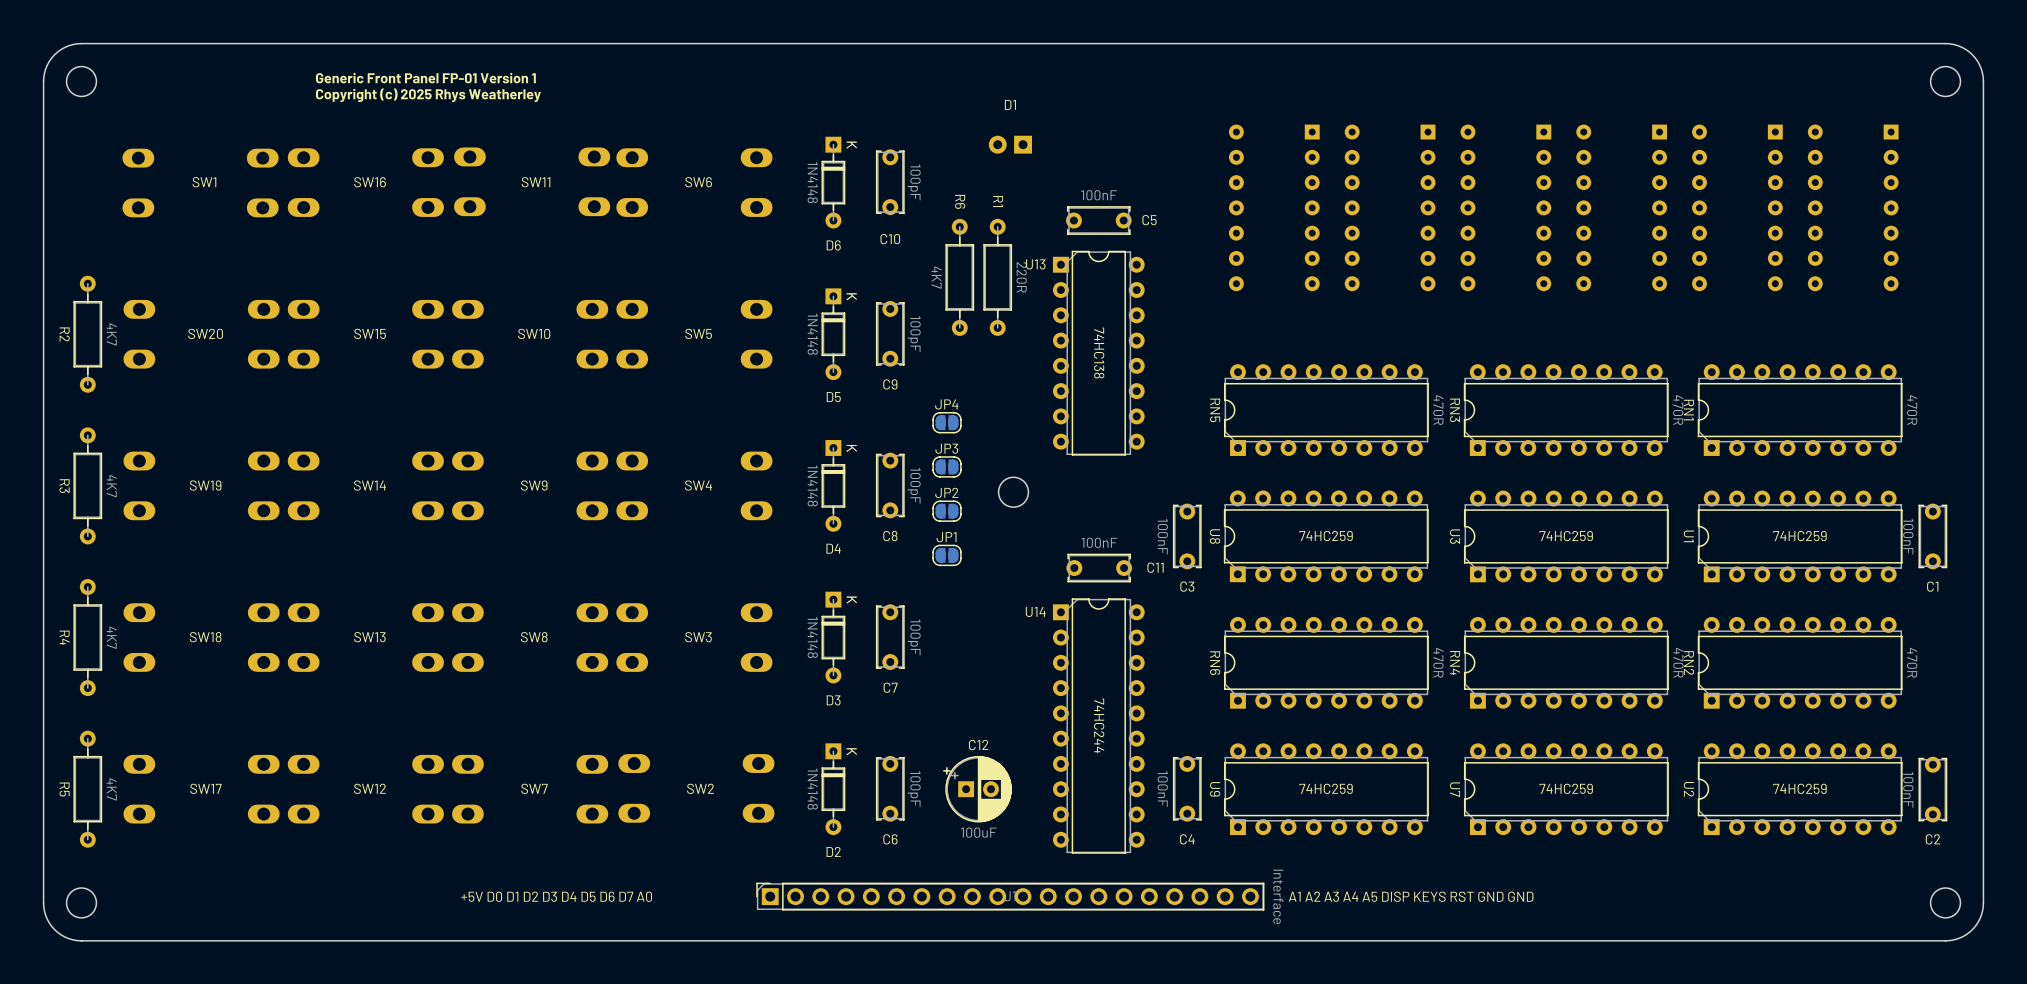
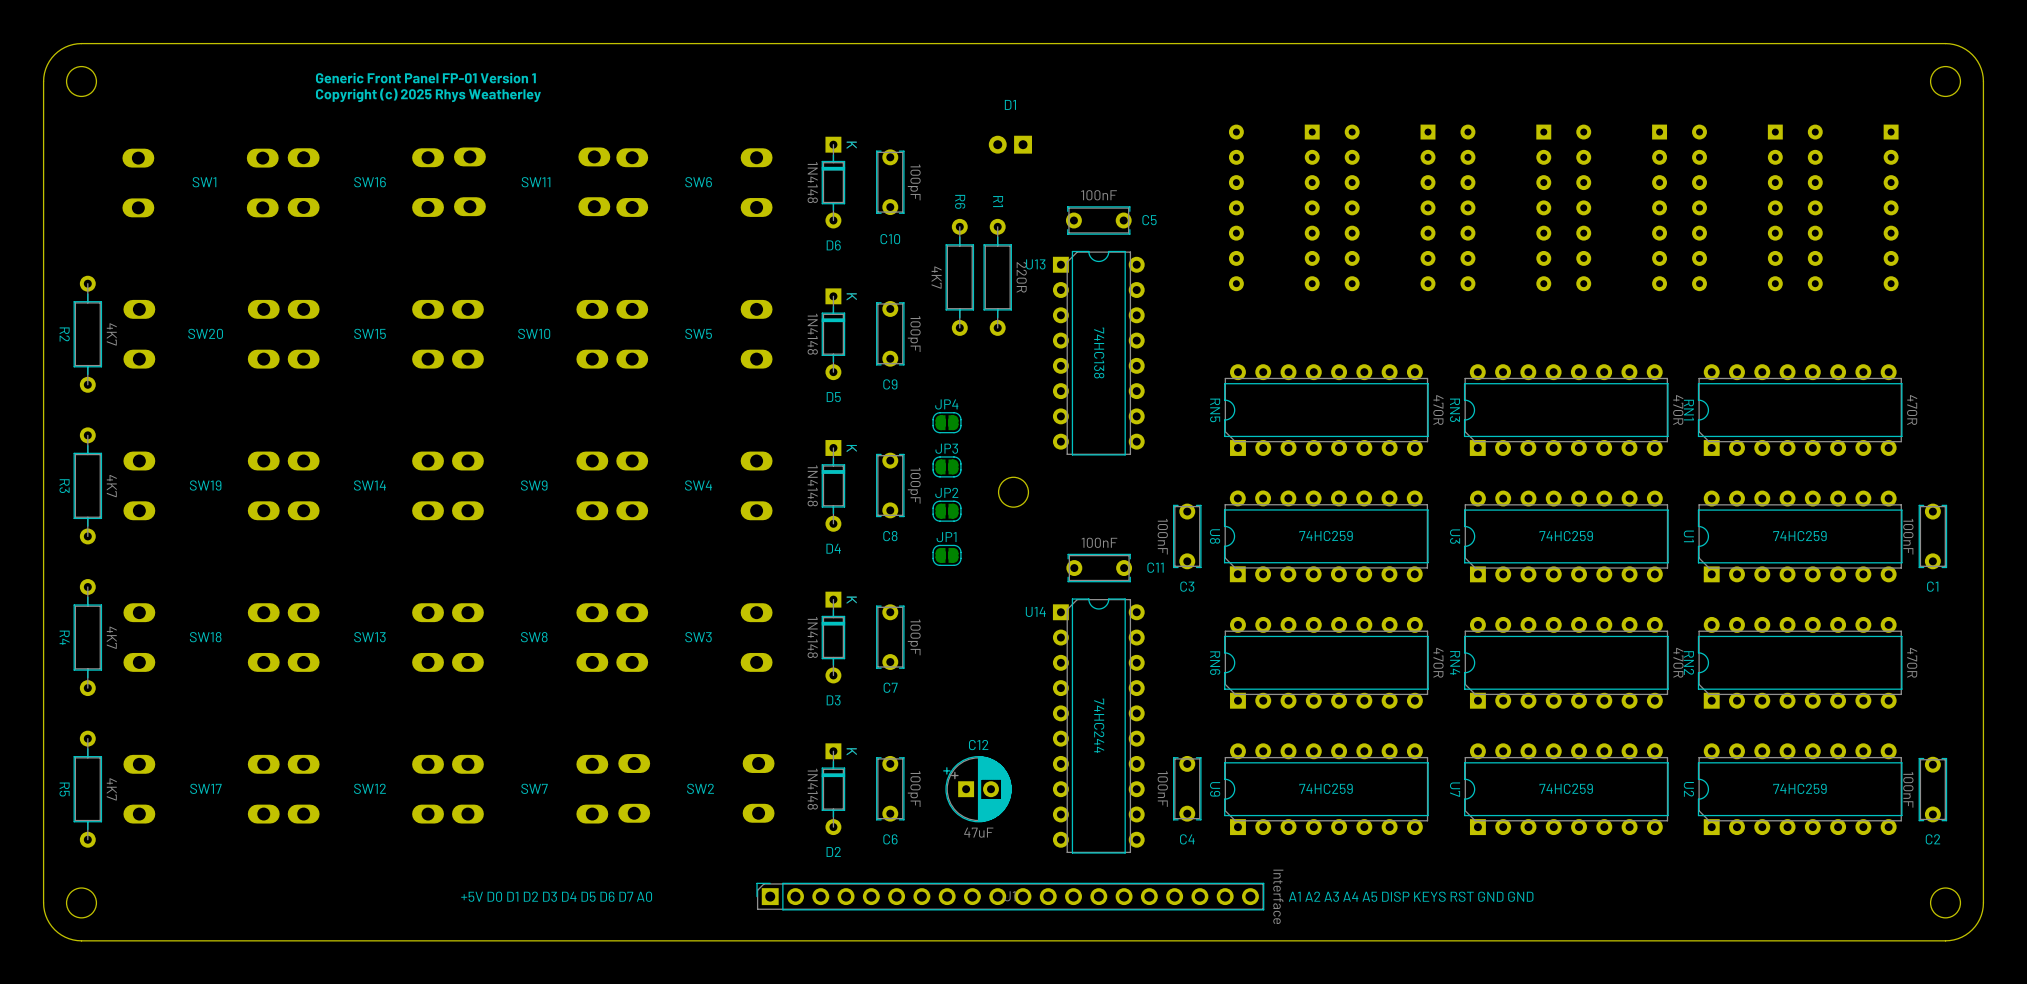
C12 value: 100uF (978, 832) -> 47uF (978, 832)

